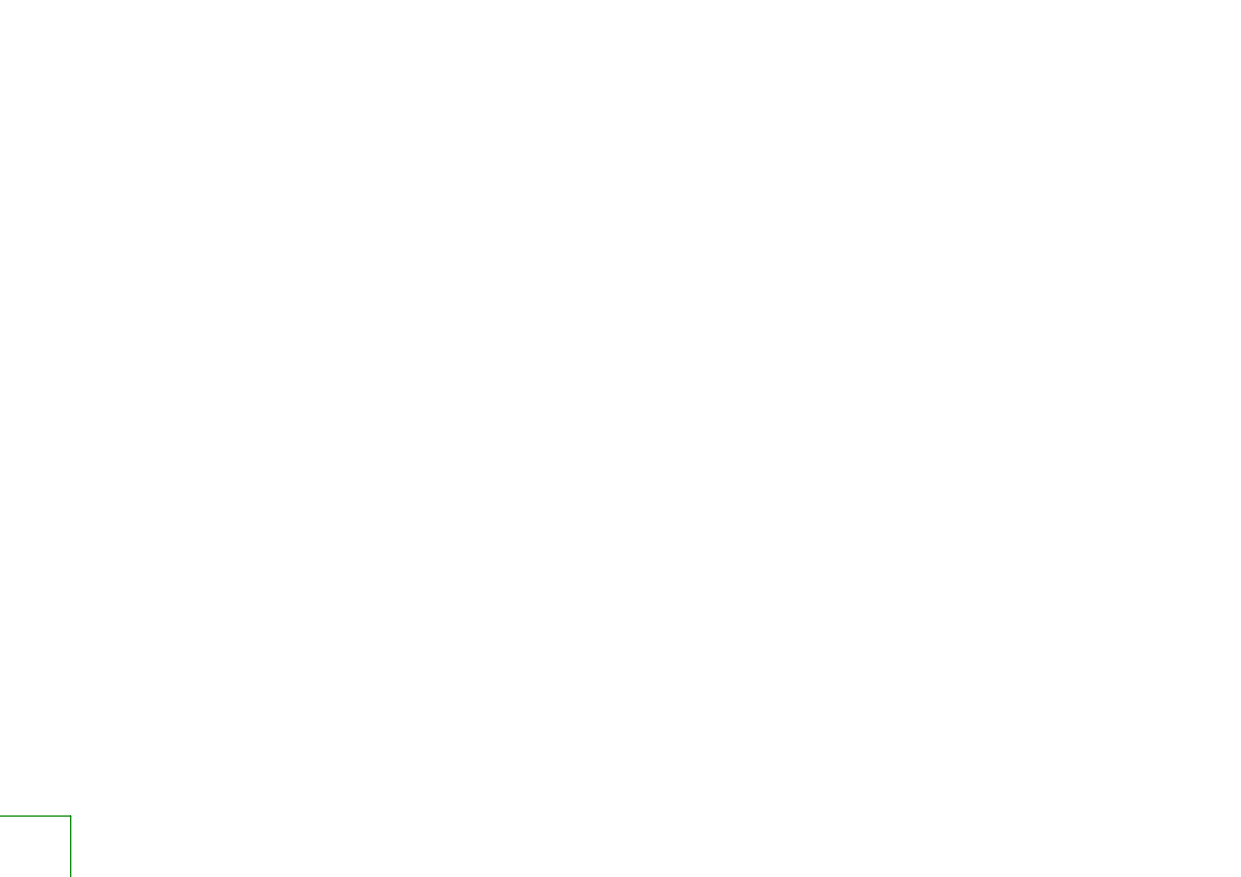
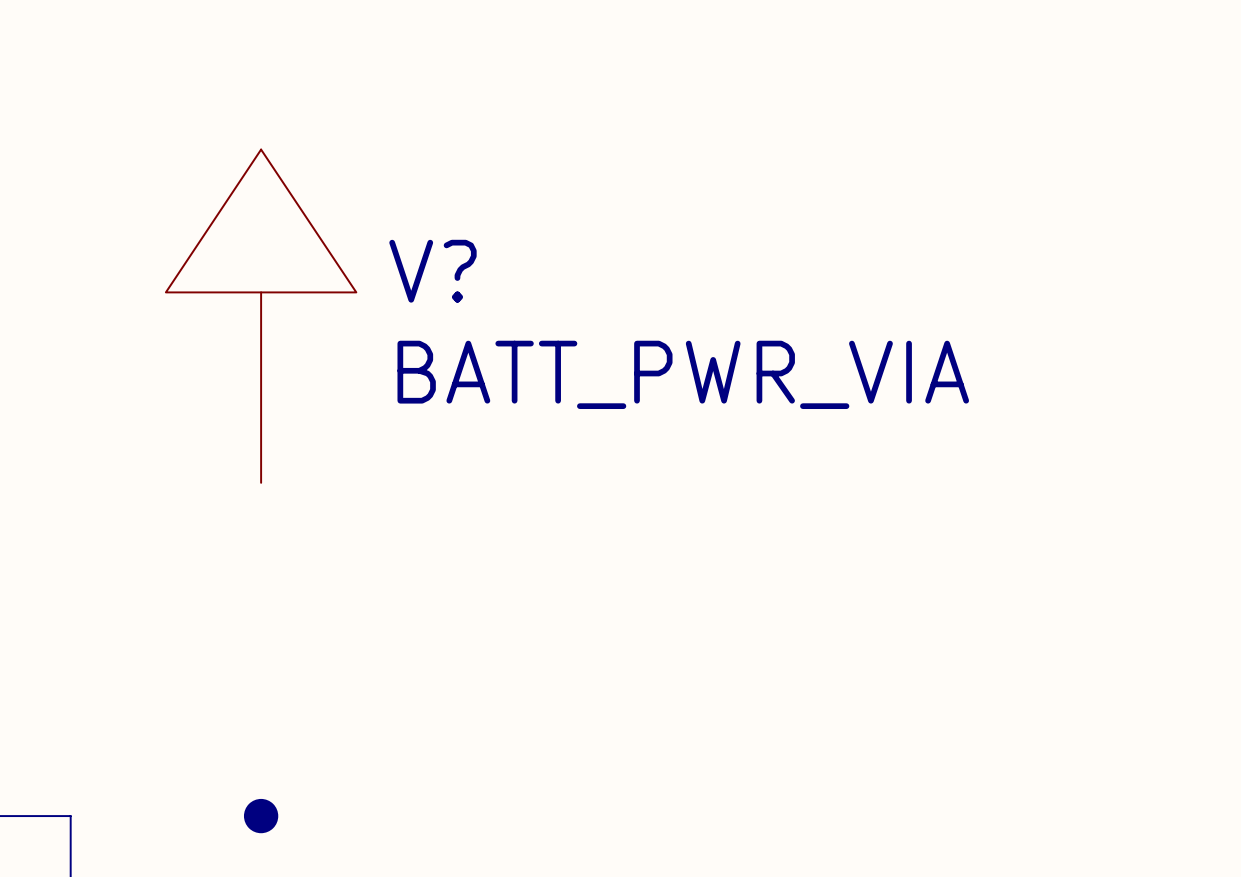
V?: none -> BATT_PWR_VIA (261, 316)
junction: none -> (261, 816)

